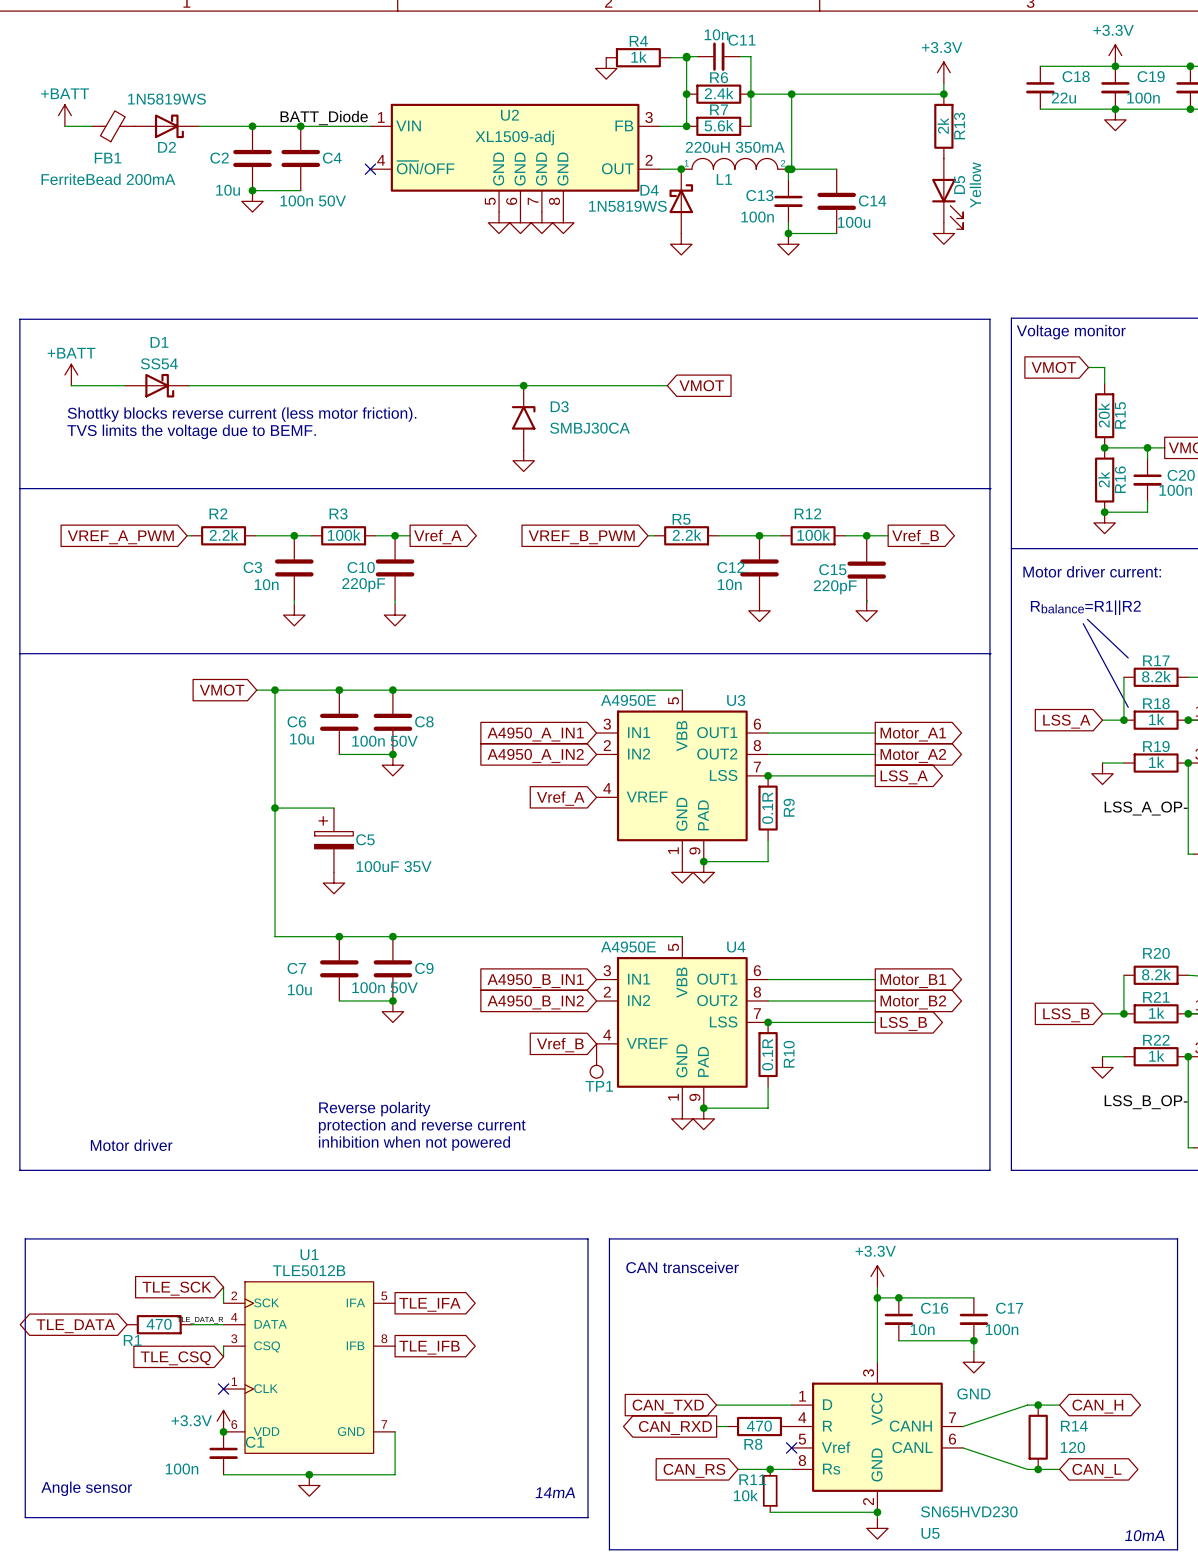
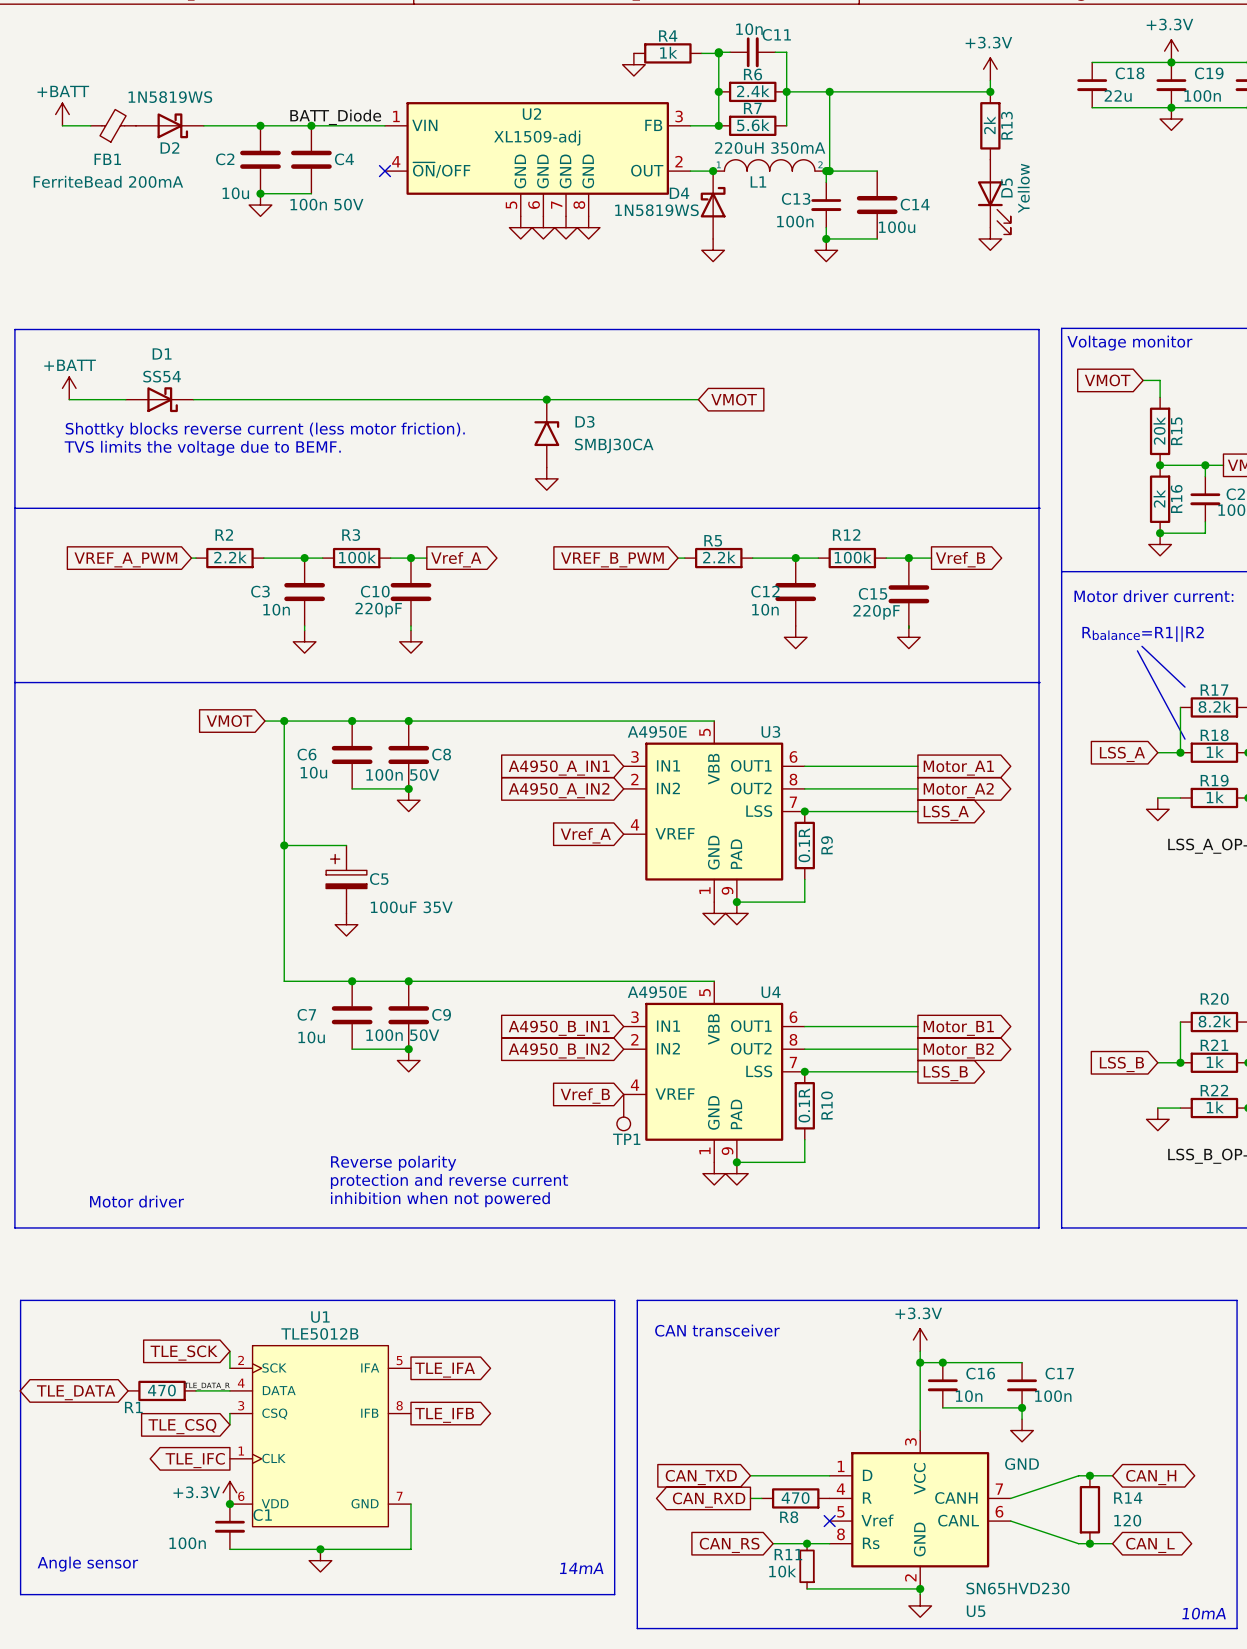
no-connect mark: (223, 1389) -> none
global label: none -> TLE_IFC (195, 1460)

